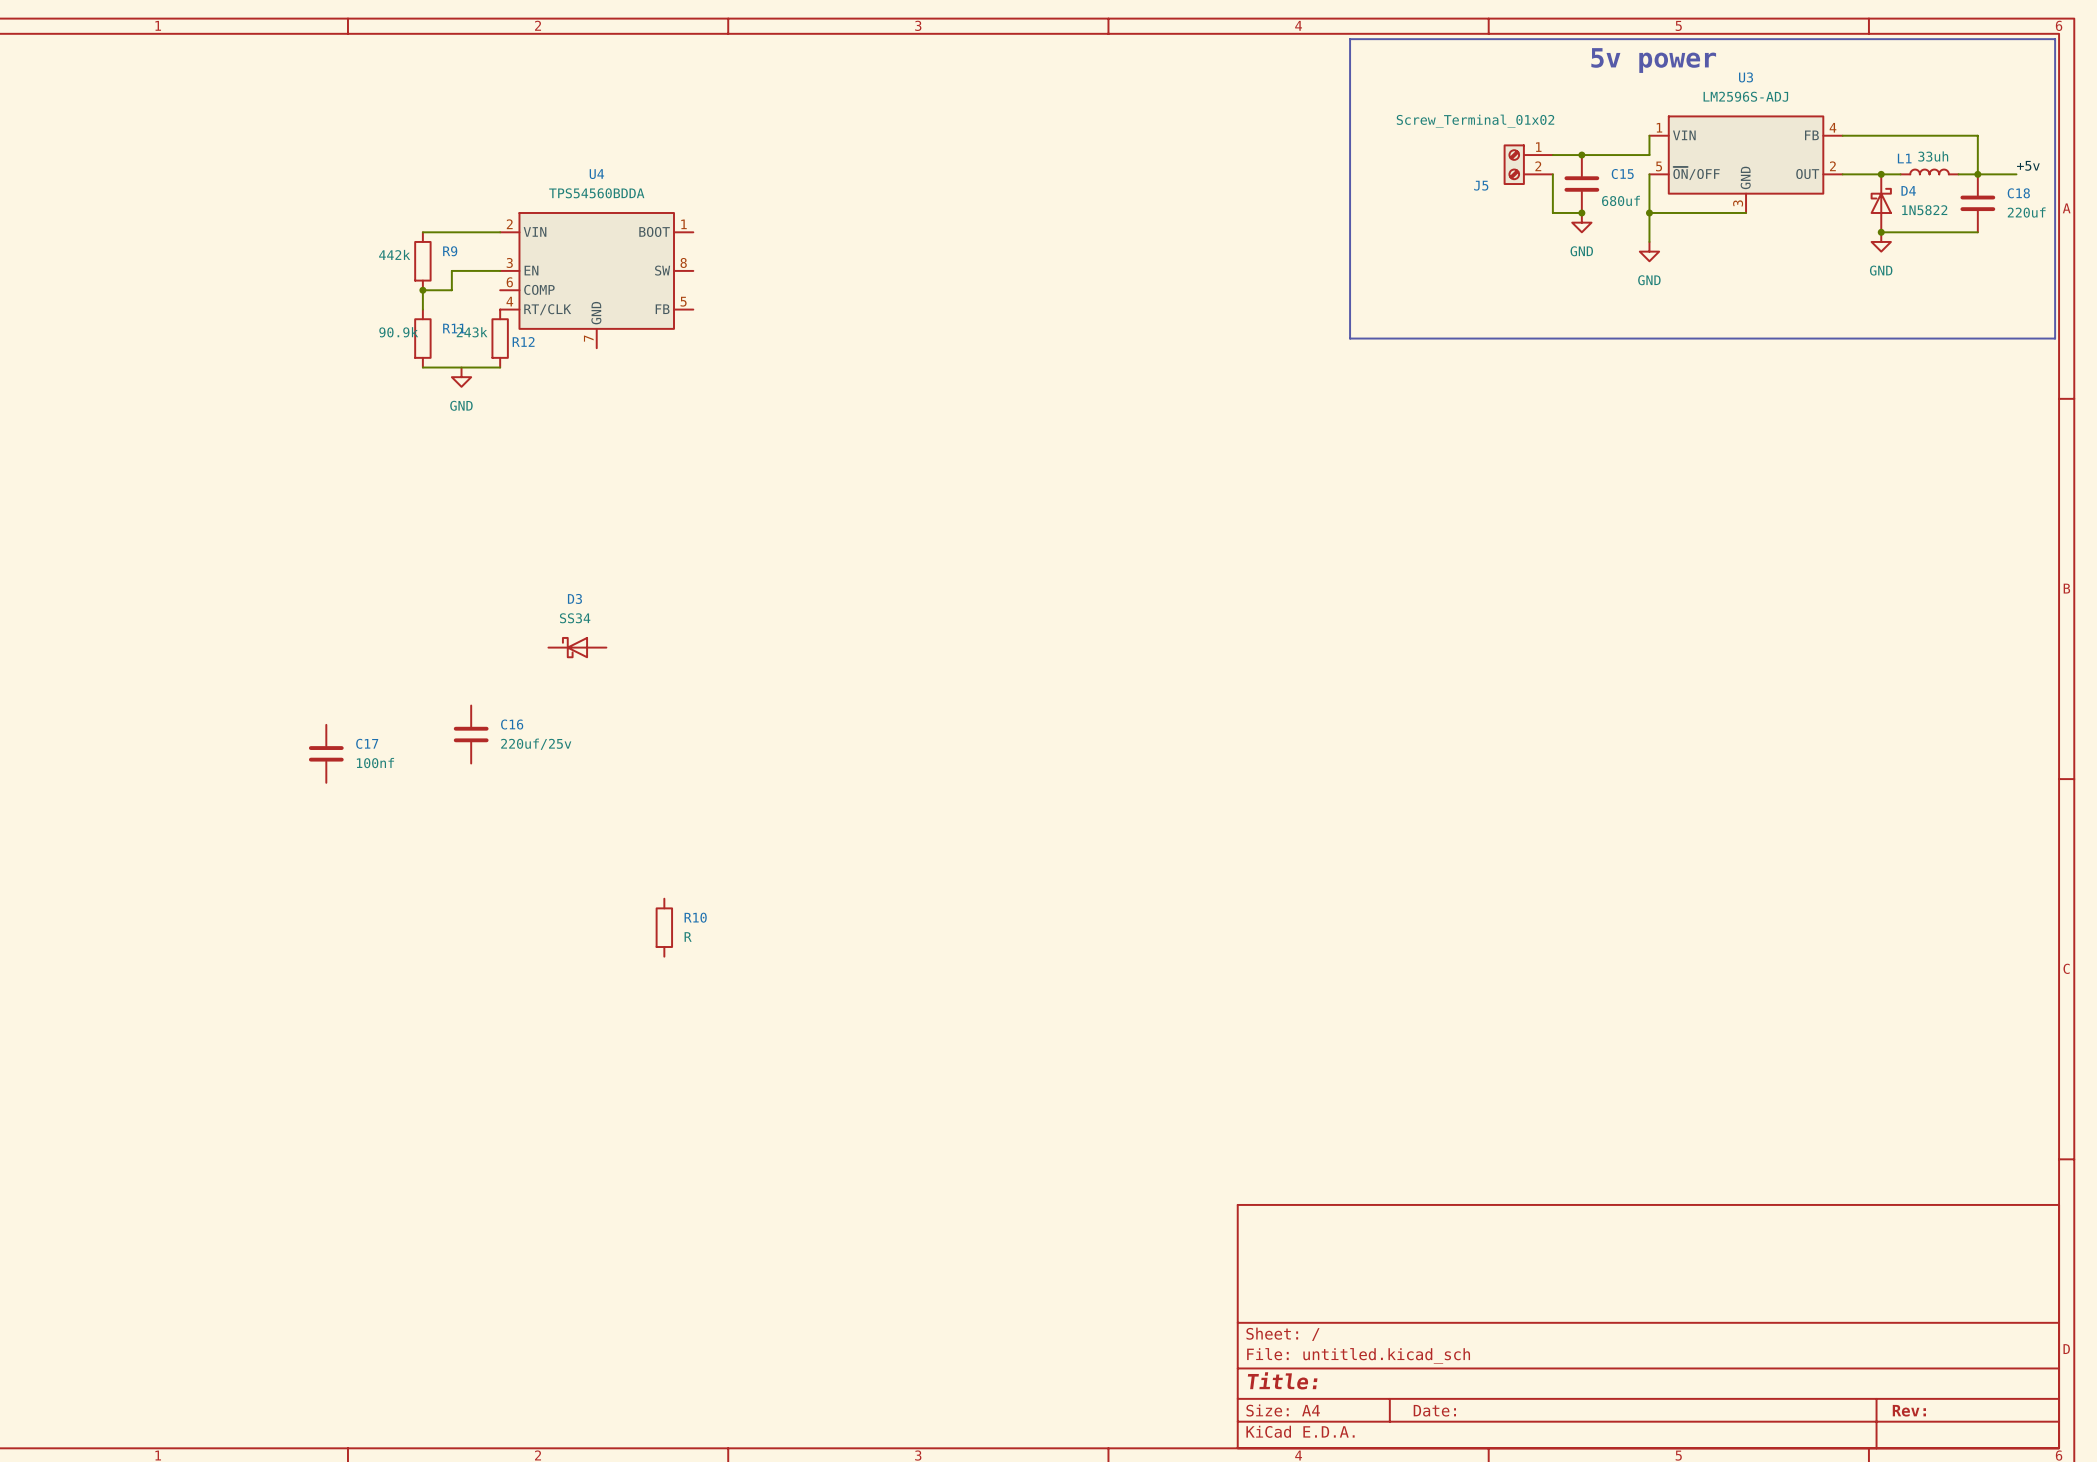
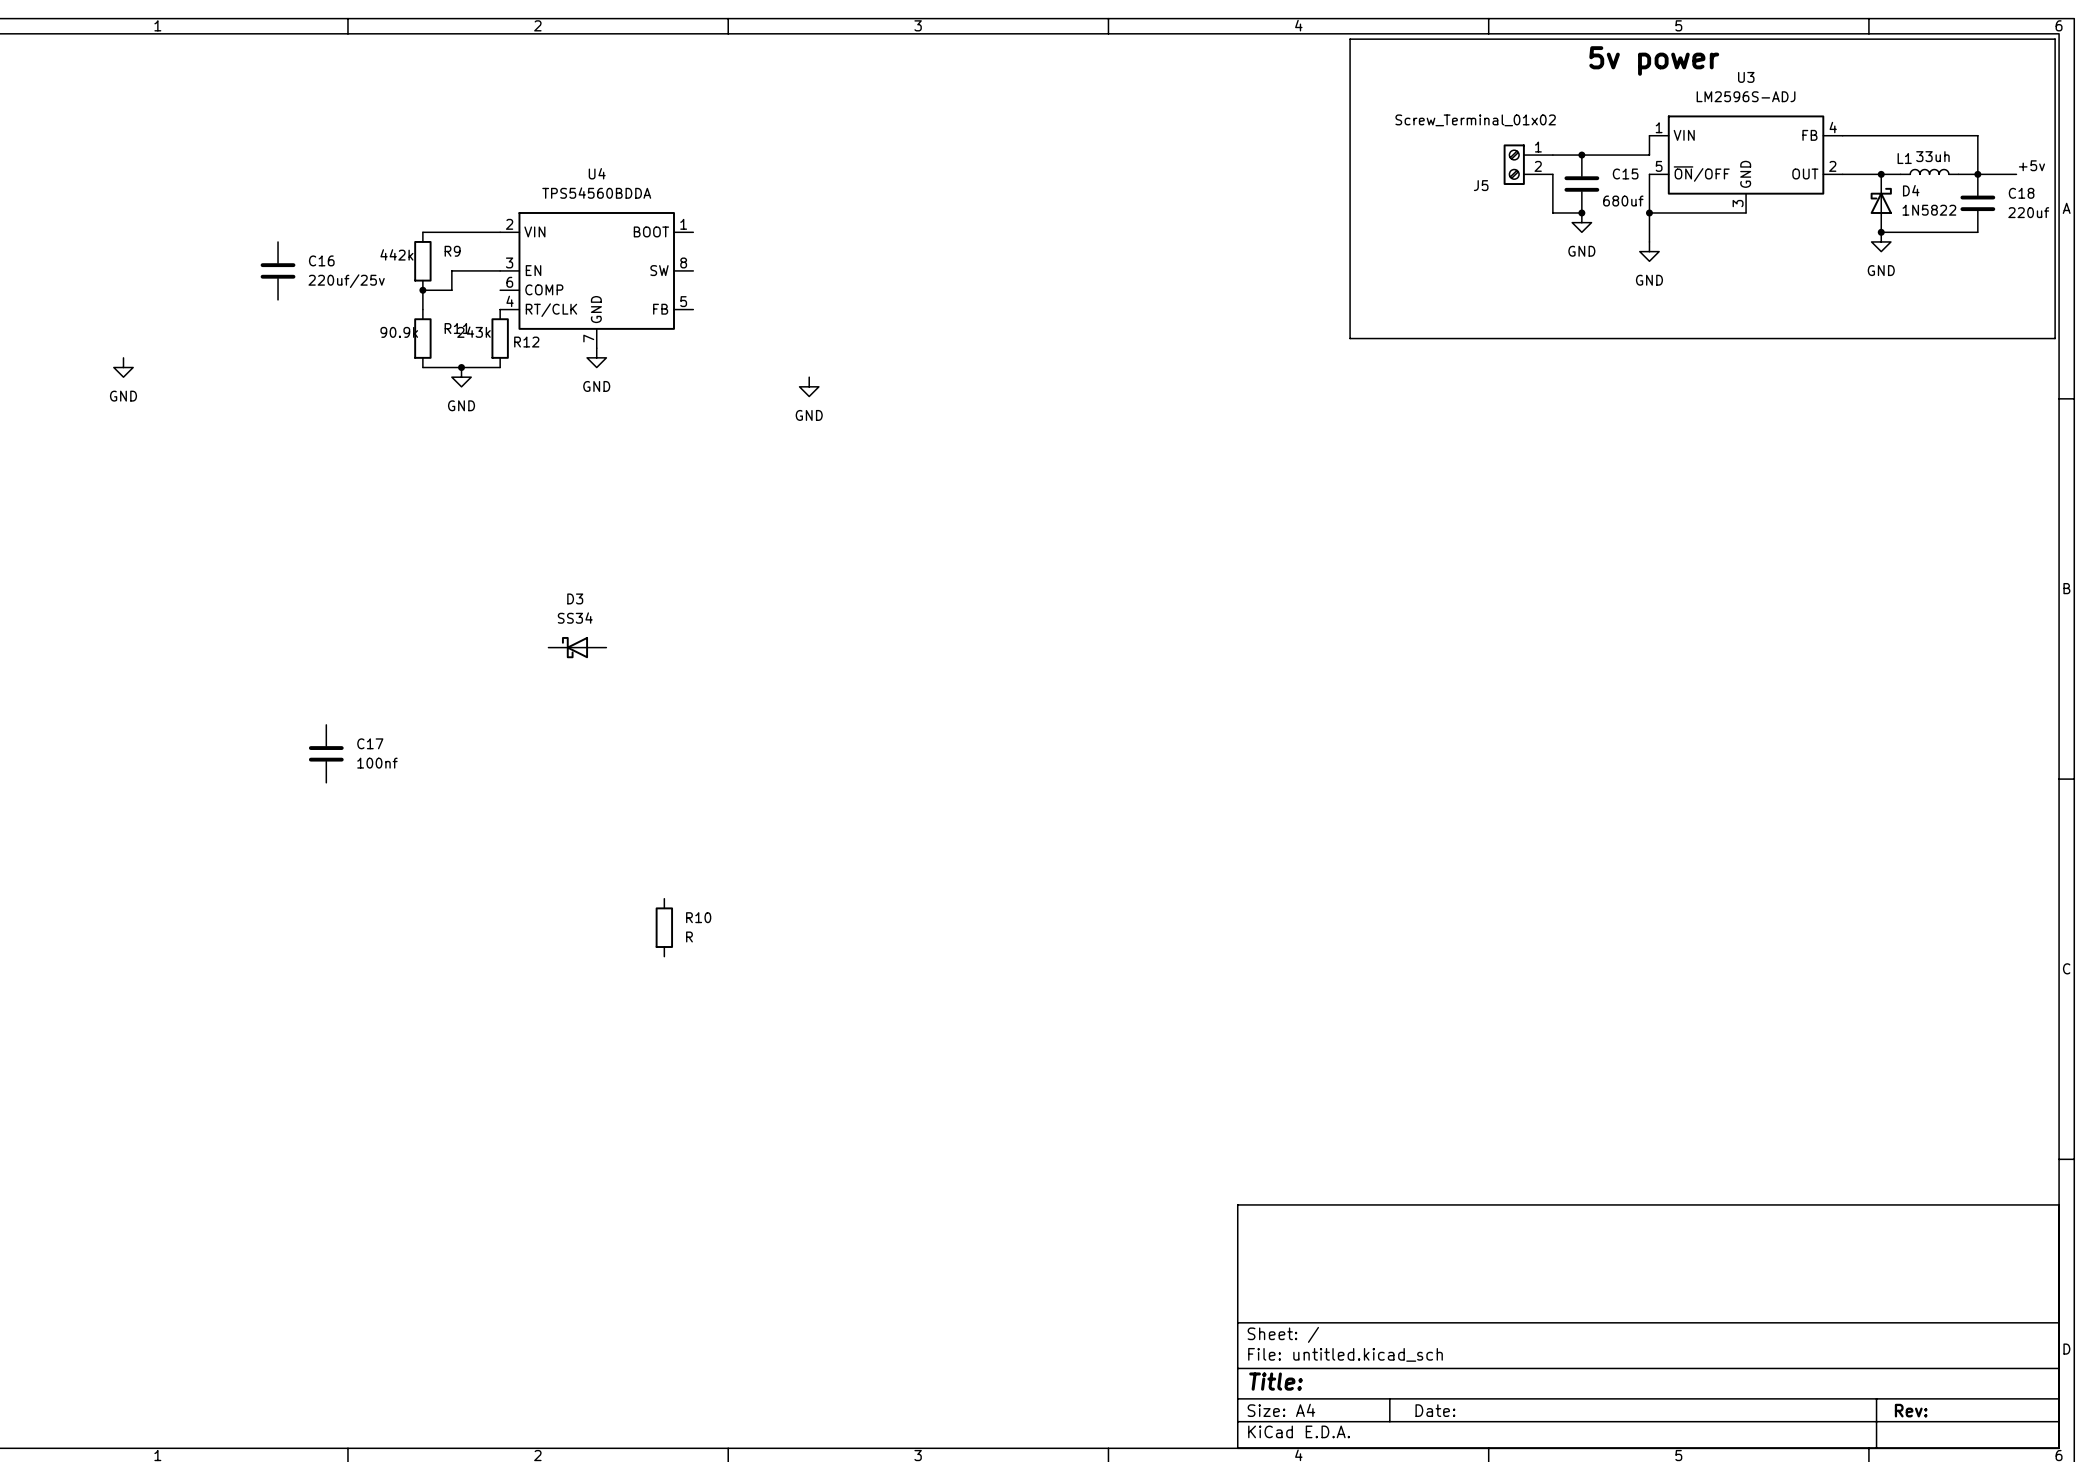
power symbol: none -> GND (596, 357)
power symbol: none -> GND (123, 367)
junction: none -> (461, 367)
power symbol: none -> GND (809, 386)
C16 position: (471, 734) -> (278, 270)

